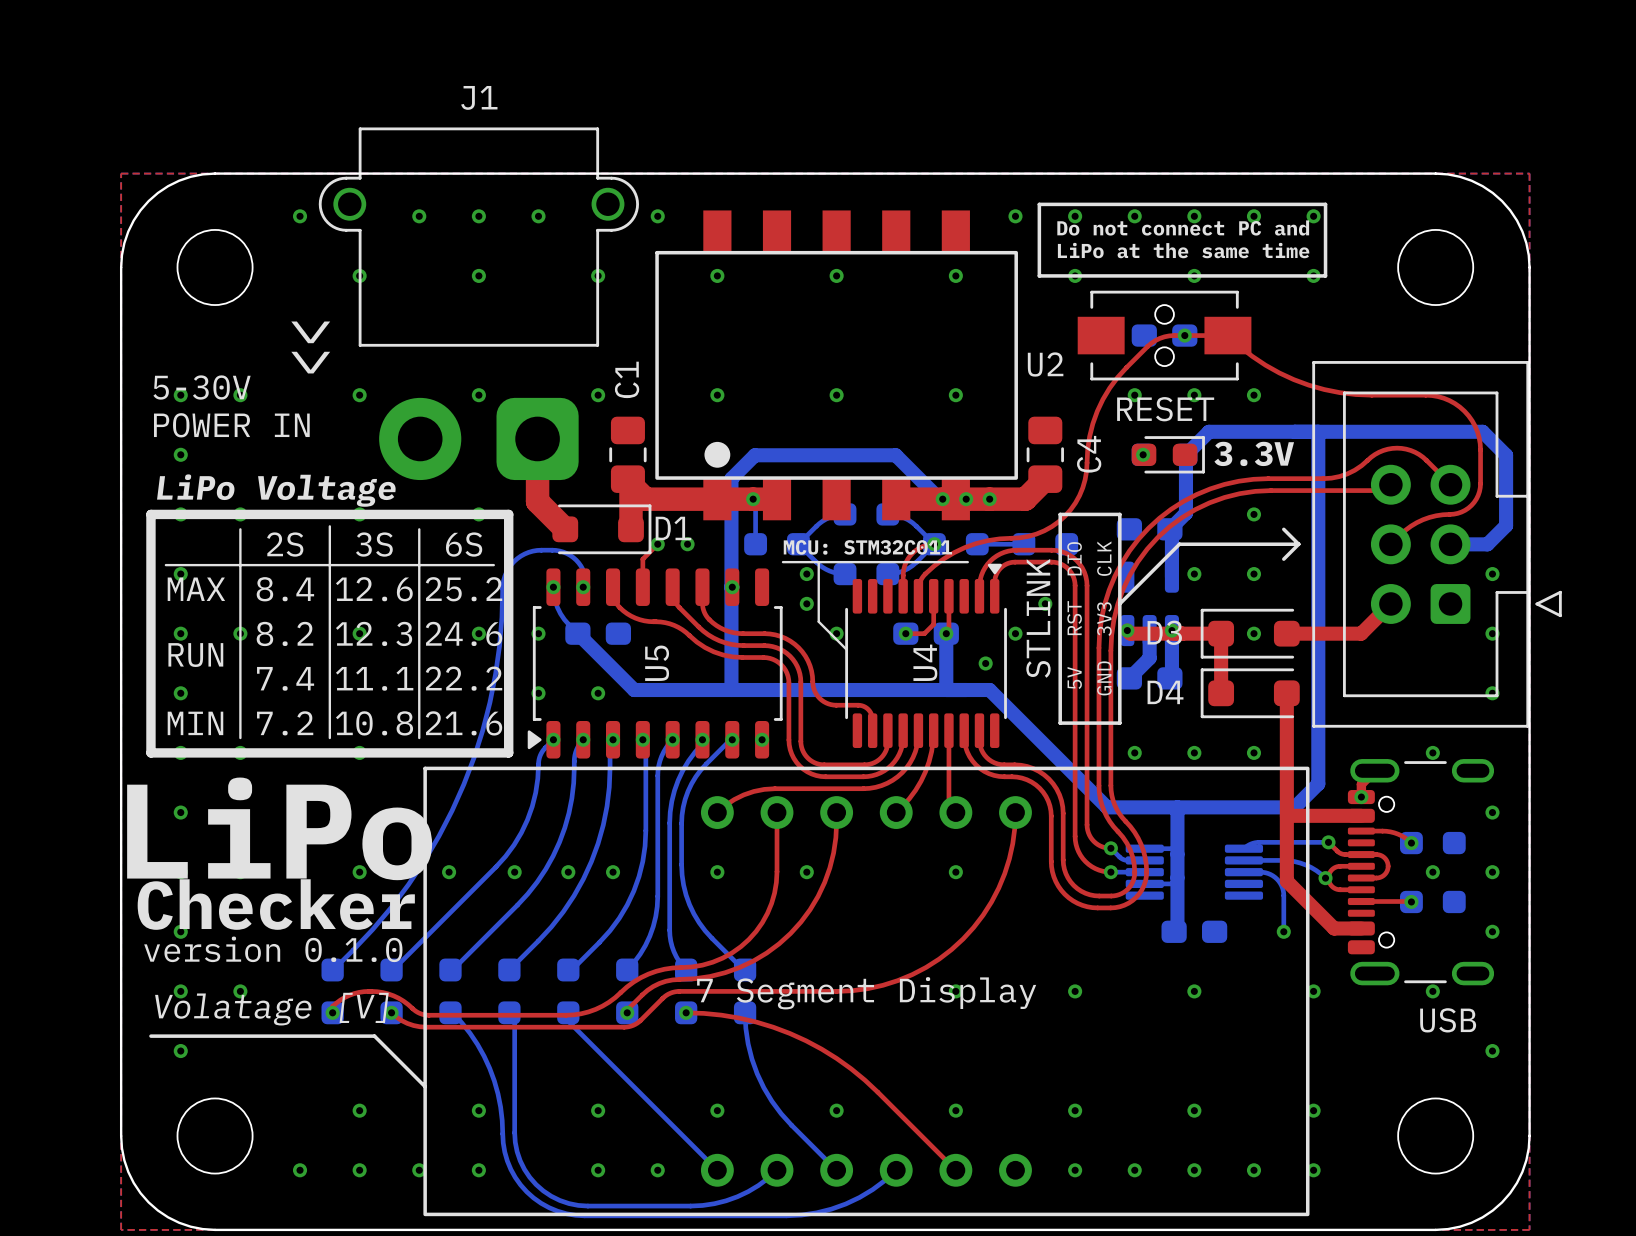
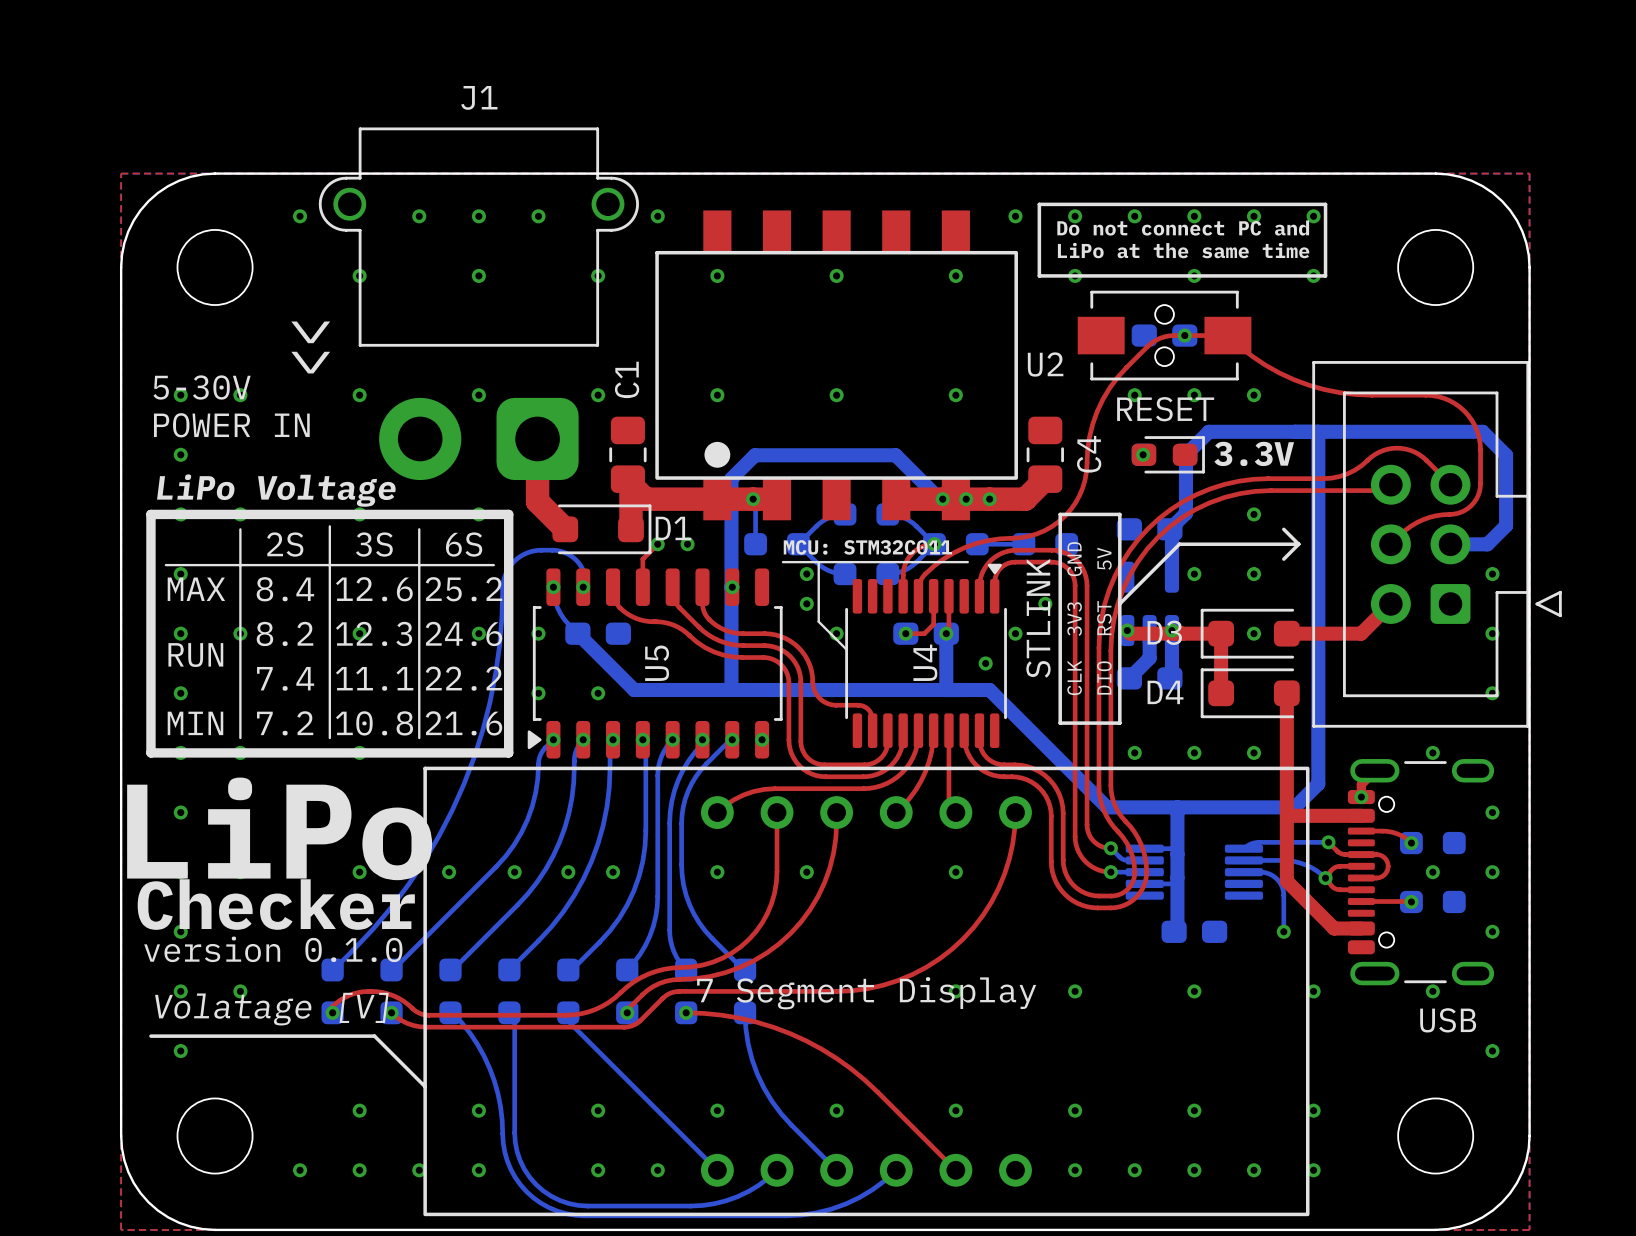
text: DIO (1074, 558) -> GND (1074, 559)
text: CLK (1104, 558) -> 5V (1104, 558)
text: RST (1074, 618) -> 3V3 (1074, 619)
text: 3V3 (1104, 619) -> RST (1104, 618)
text: 5V (1074, 678) -> CLK (1074, 677)
text: GND (1104, 678) -> DIO (1104, 678)

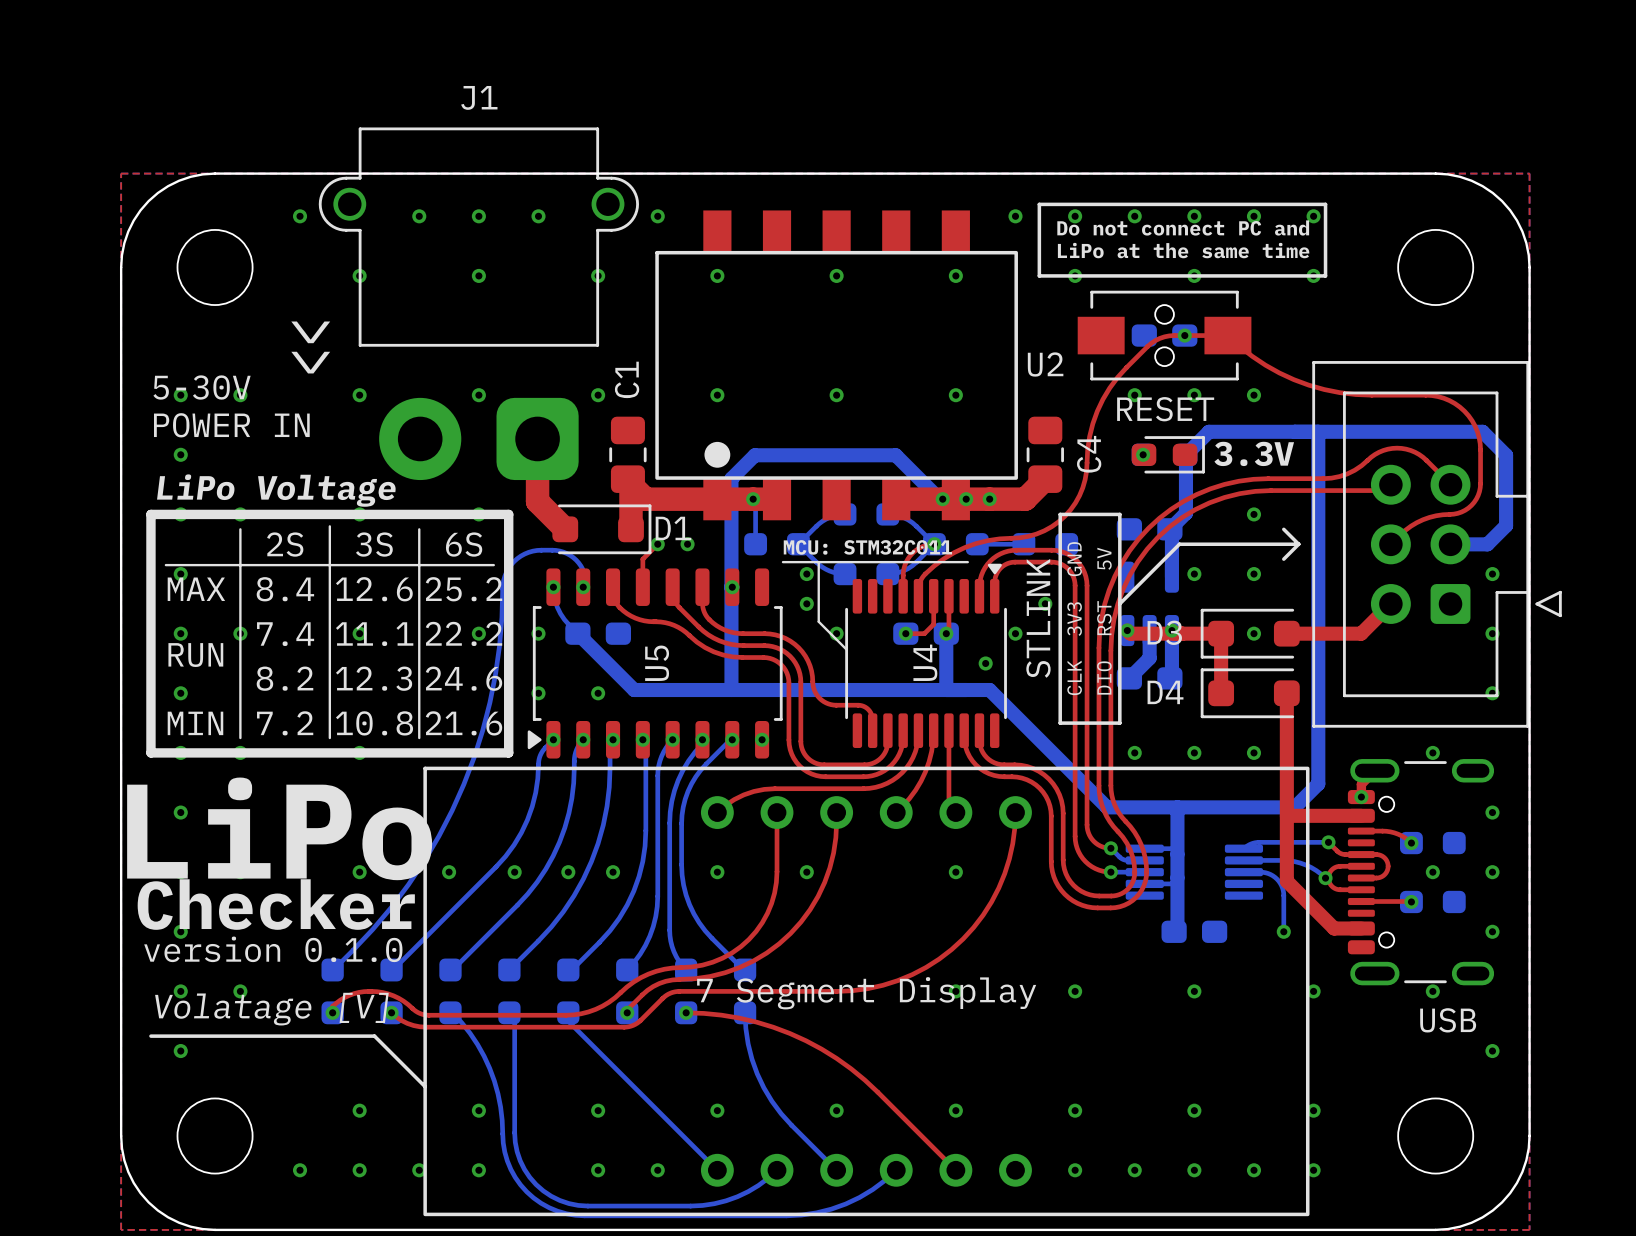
text: 8.2 (284, 633) -> 7.4 (285, 634)
text: 12.3 (374, 633) -> 11.1 (374, 634)
text: 24.6 (464, 633) -> 22.2 (464, 633)
text: 7.4 (285, 678) -> 8.2 (284, 678)
text: 11.1 (374, 678) -> 12.3 (374, 678)
text: 22.2 (464, 678) -> 24.6 (464, 678)

